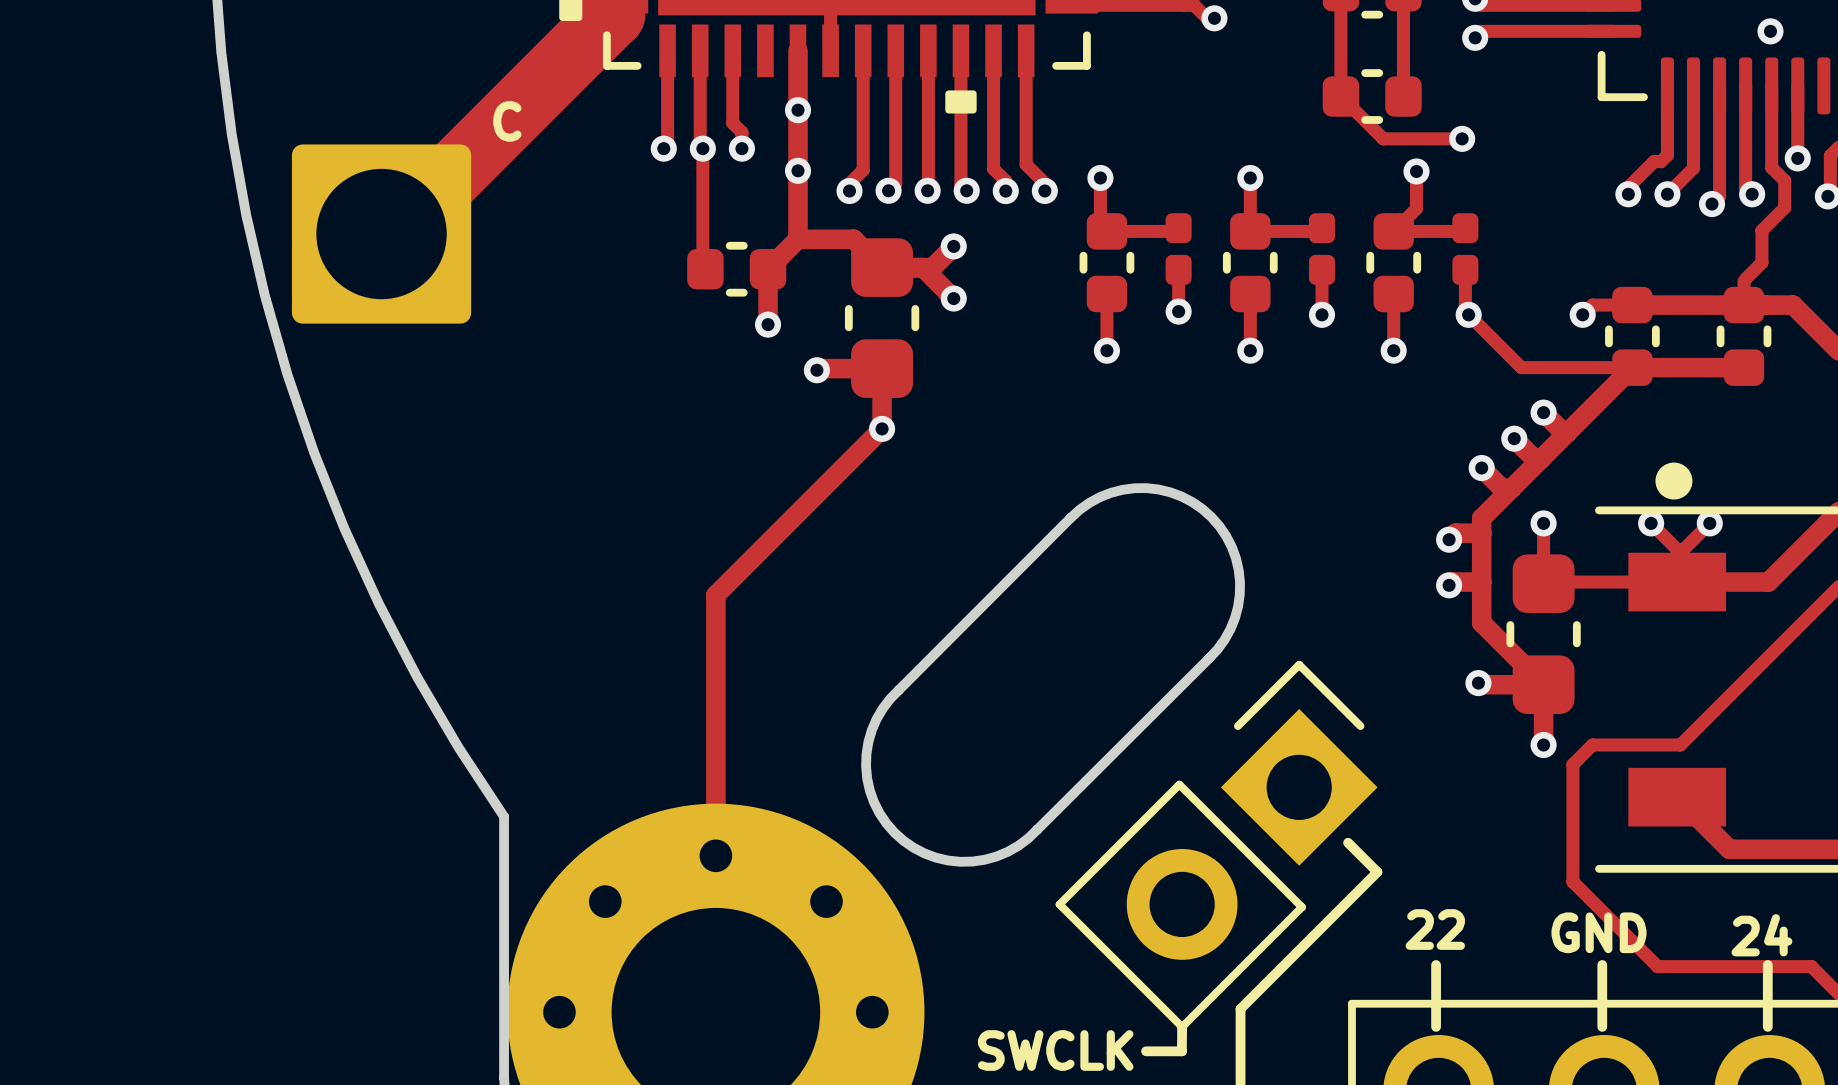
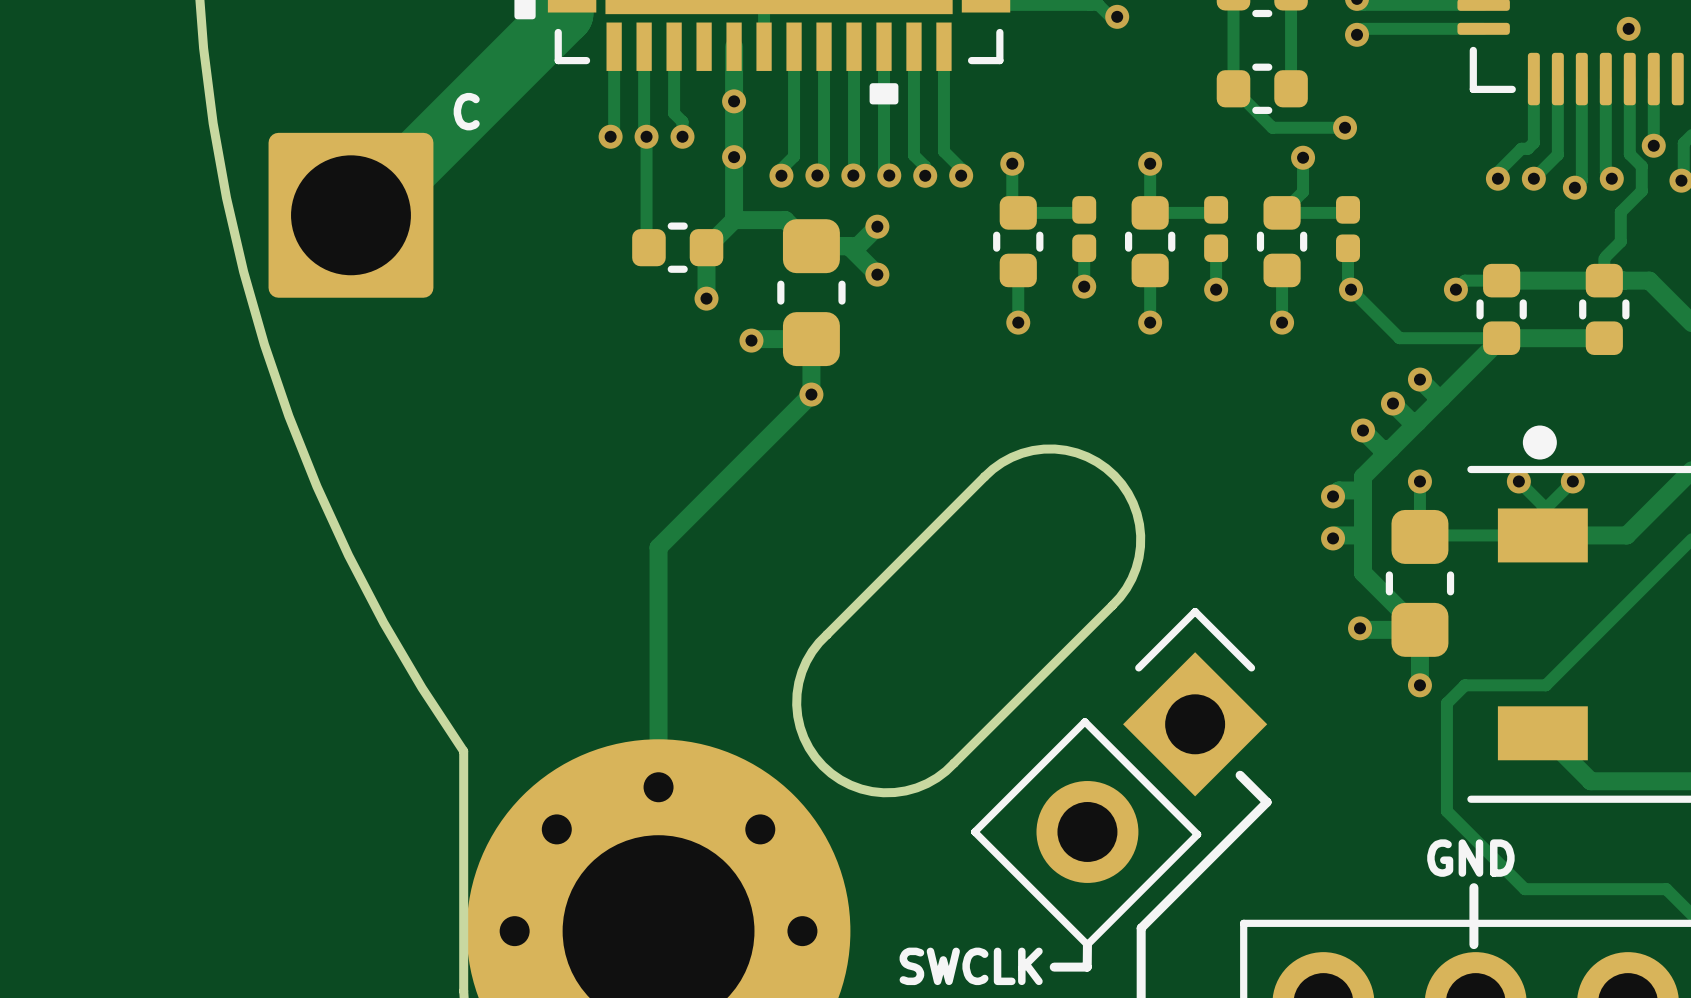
text: 22 (1435, 929) -> none
text: 24 (1761, 935) -> none
line: (1436, 964) (1436, 1026) -> none
line: (1767, 964) (1767, 1026) -> none

